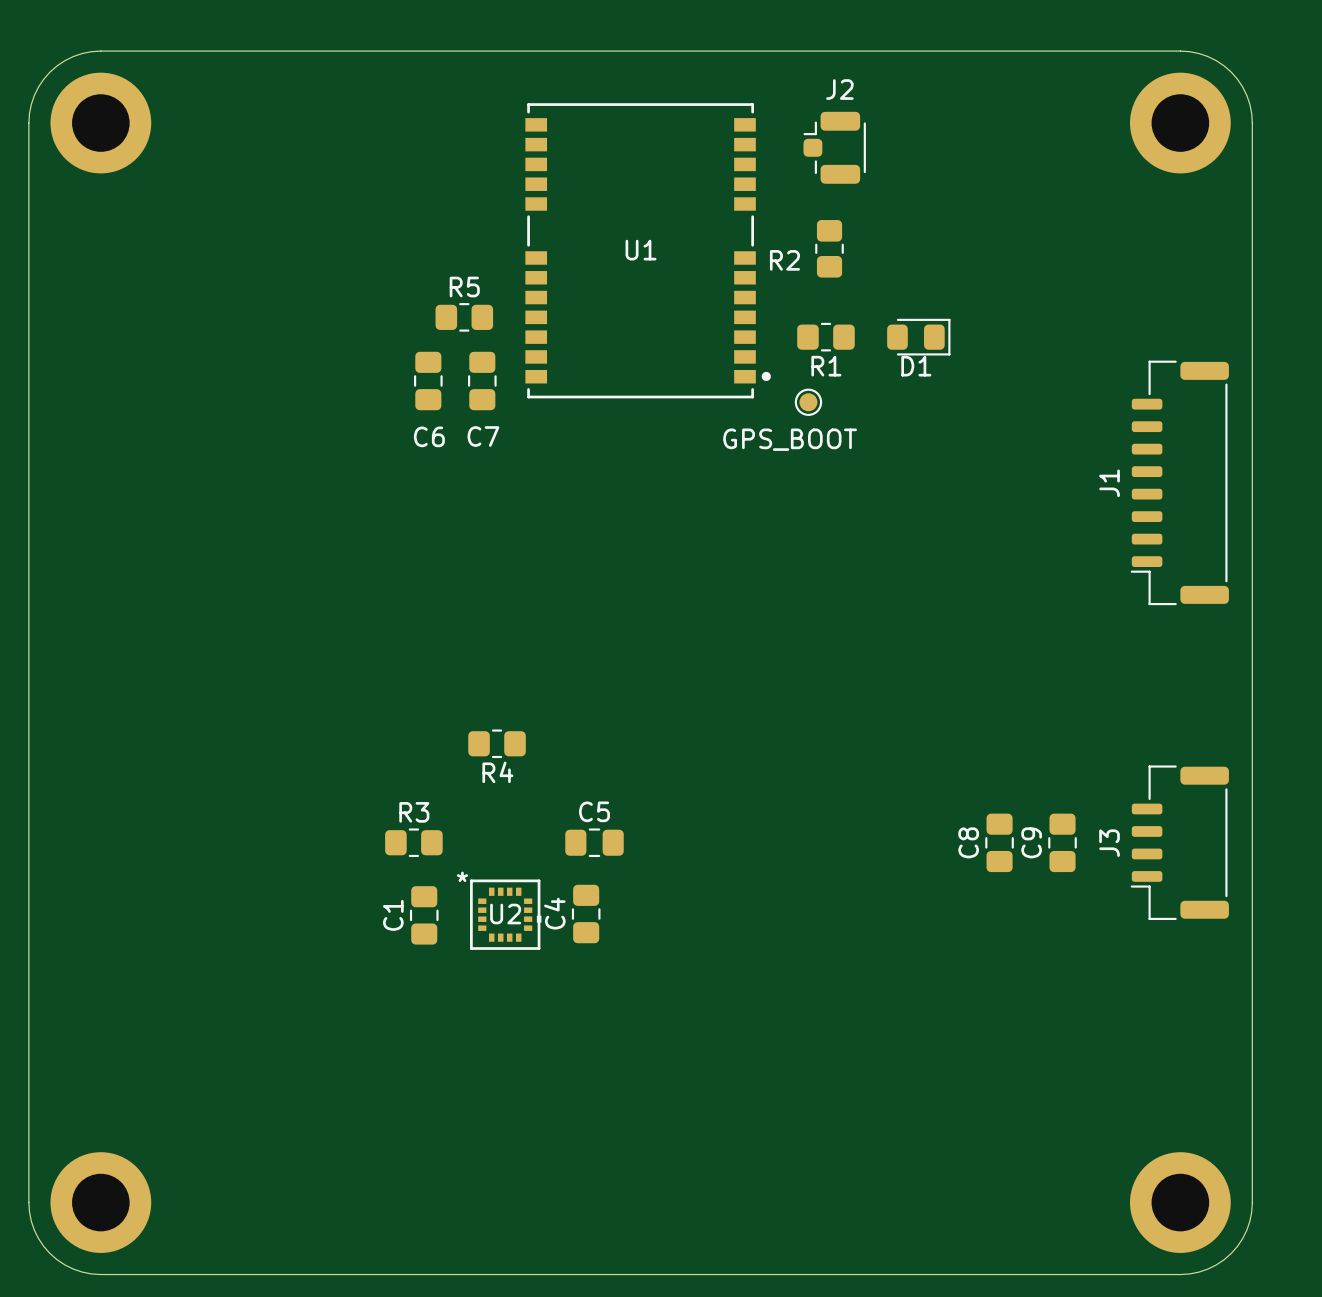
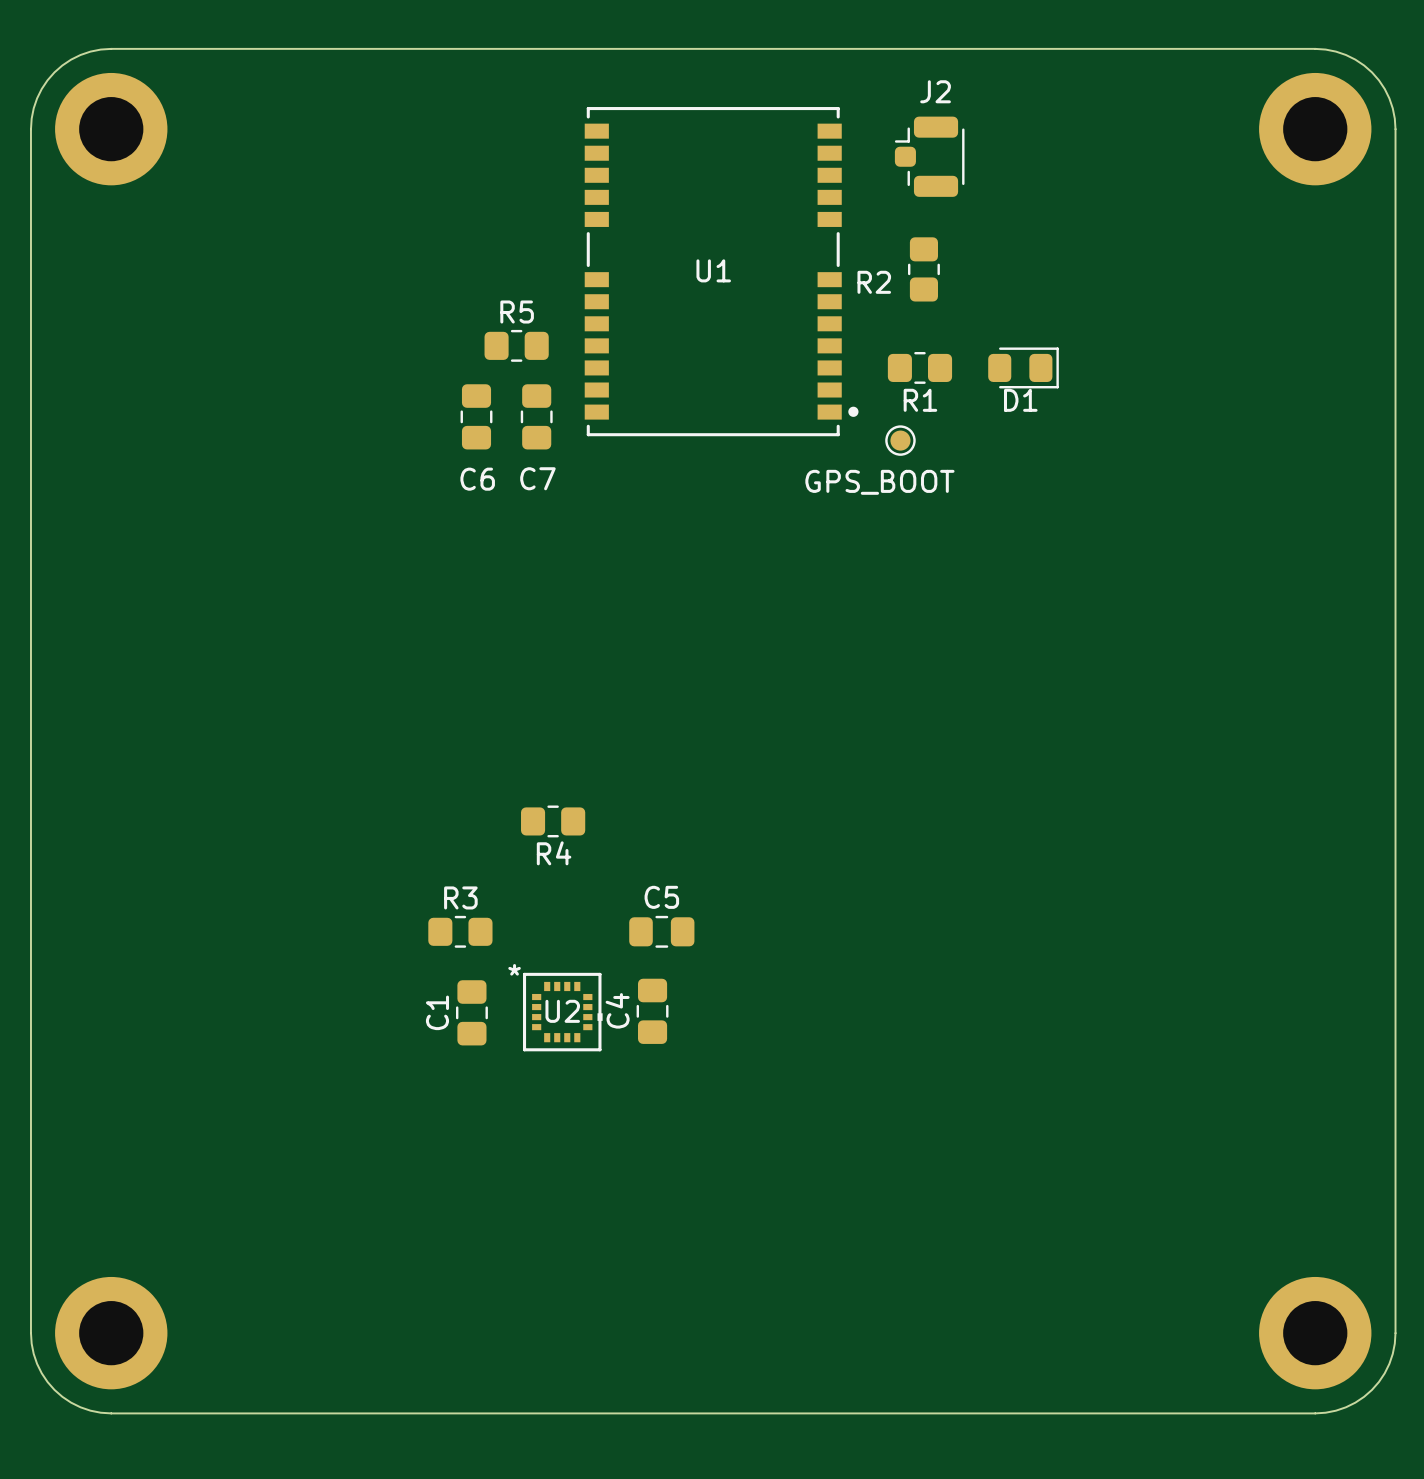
J1: (1179, 482) -> none
C8: (999, 842) -> none
C9: (1062, 842) -> none
J3: (1179, 842) -> none

